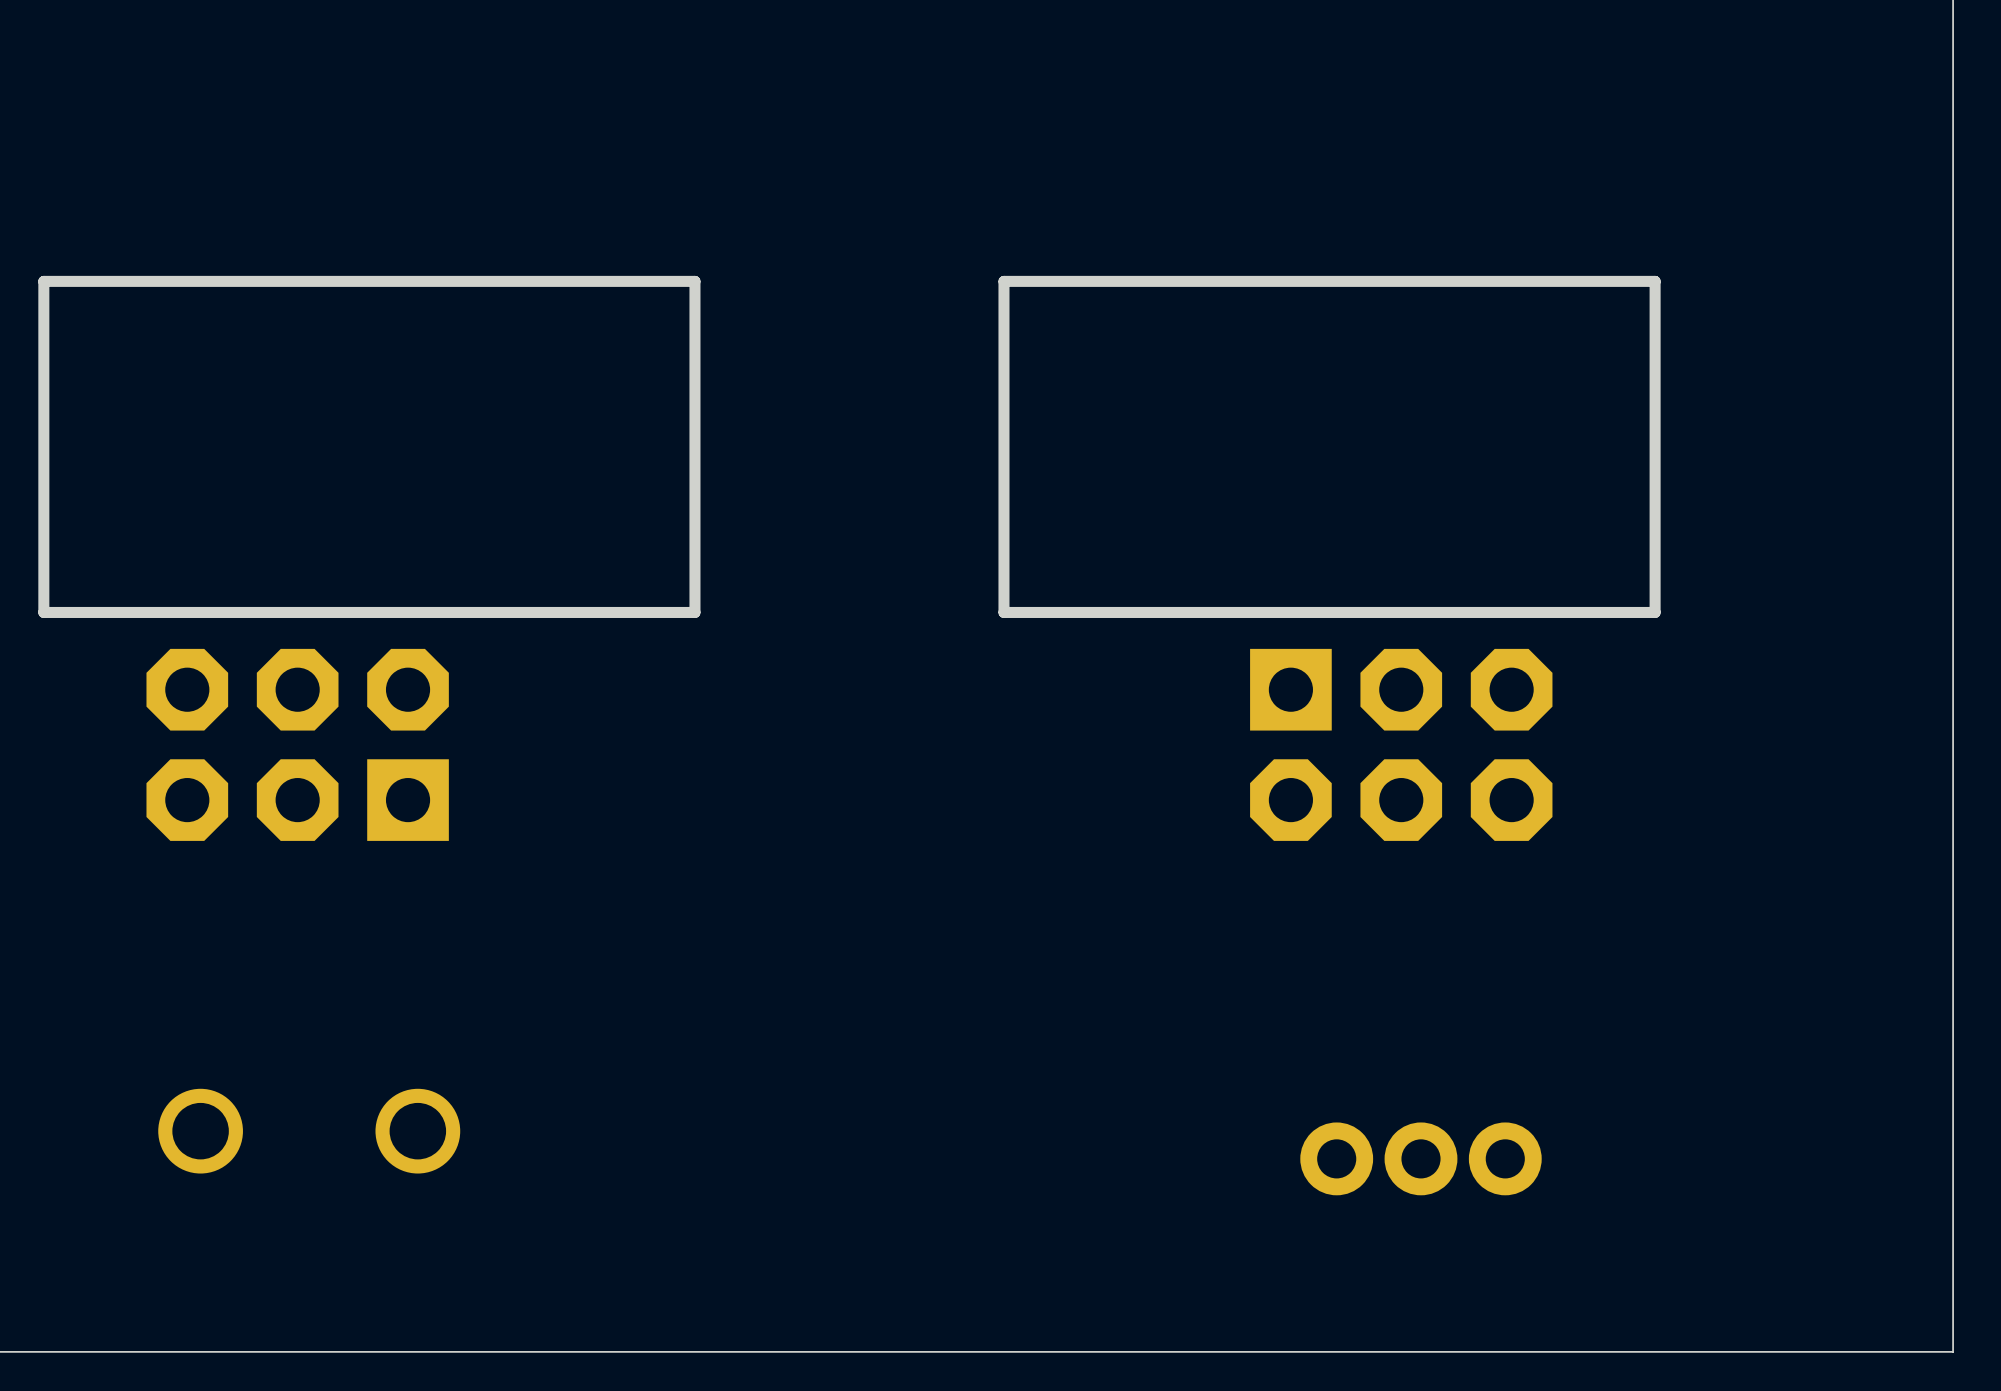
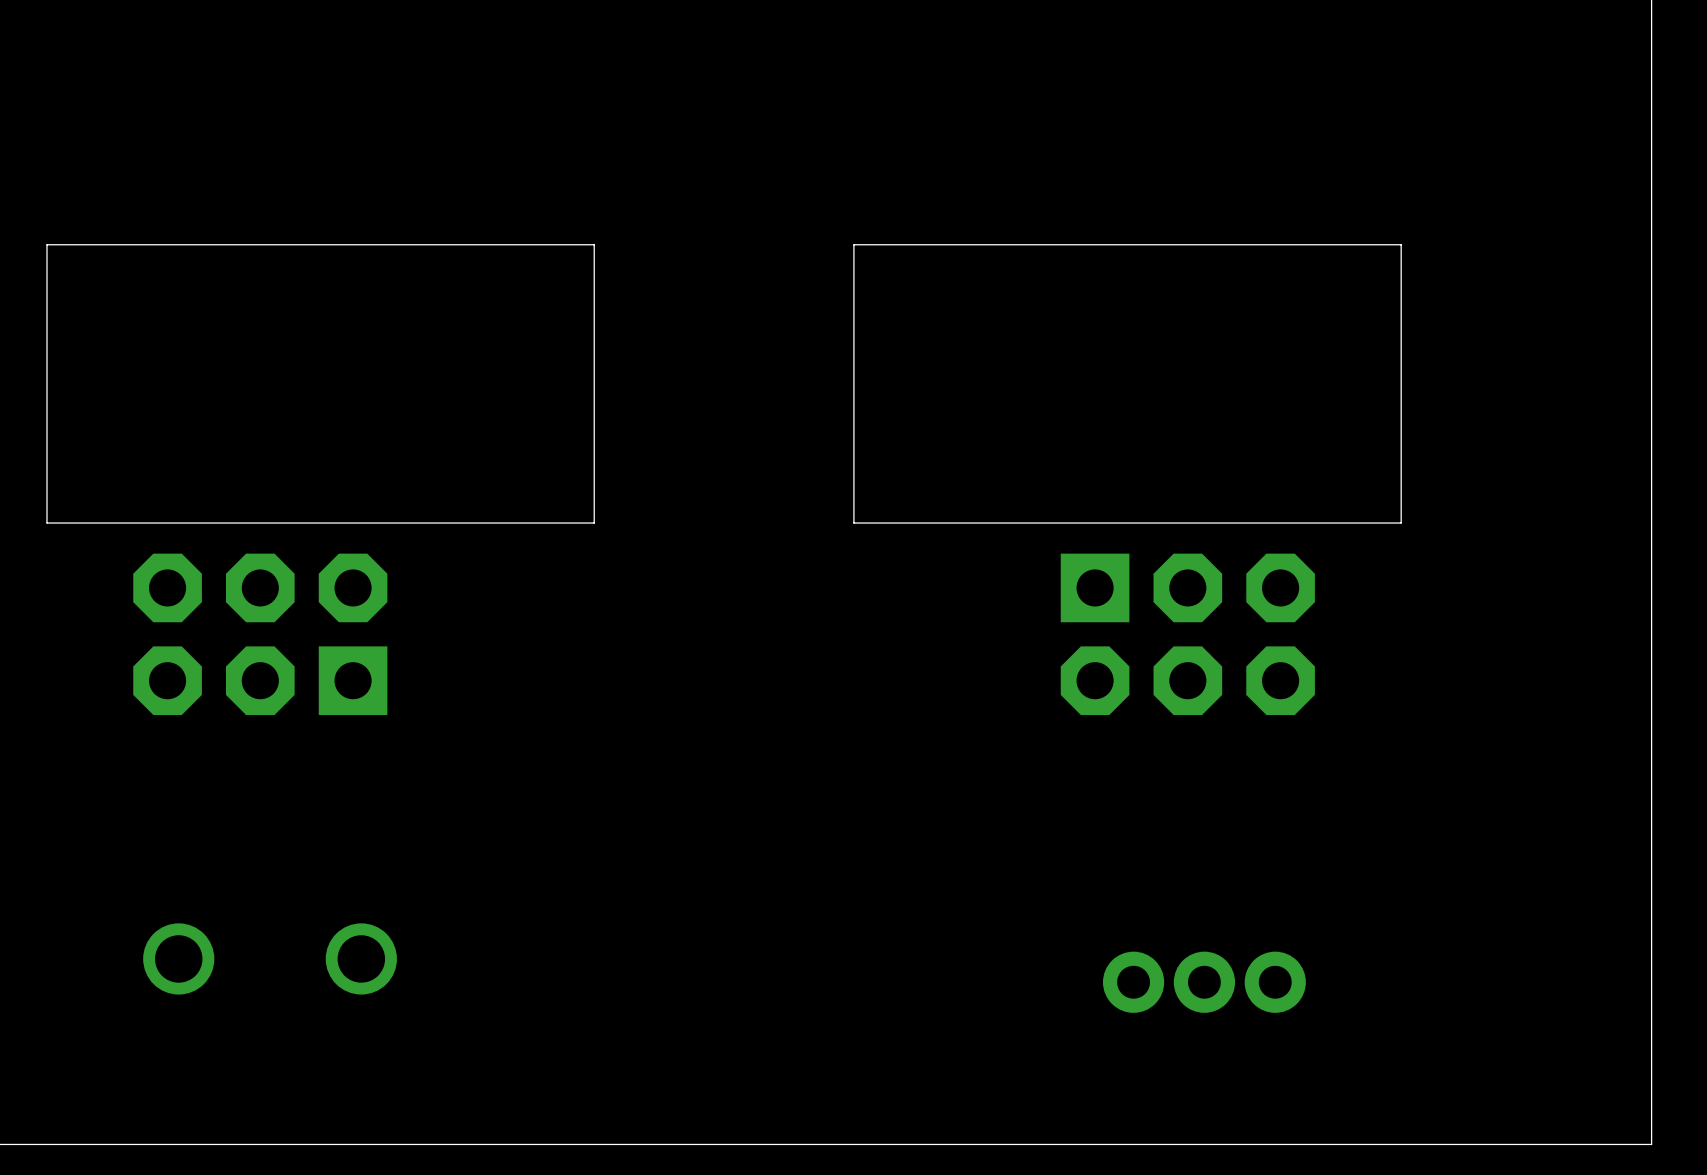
board edge width: thick (694, 281) (43, 281) (43, 612) (694, 612) (694, 281) -> thin (594, 244) (46, 244) (46, 523) (594, 523) (594, 244)
board edge width: thick (1655, 281) (1003, 281) (1003, 612) (1655, 612) (1655, 281) -> thin (1401, 244) (853, 244) (853, 523) (1401, 523) (1401, 244)

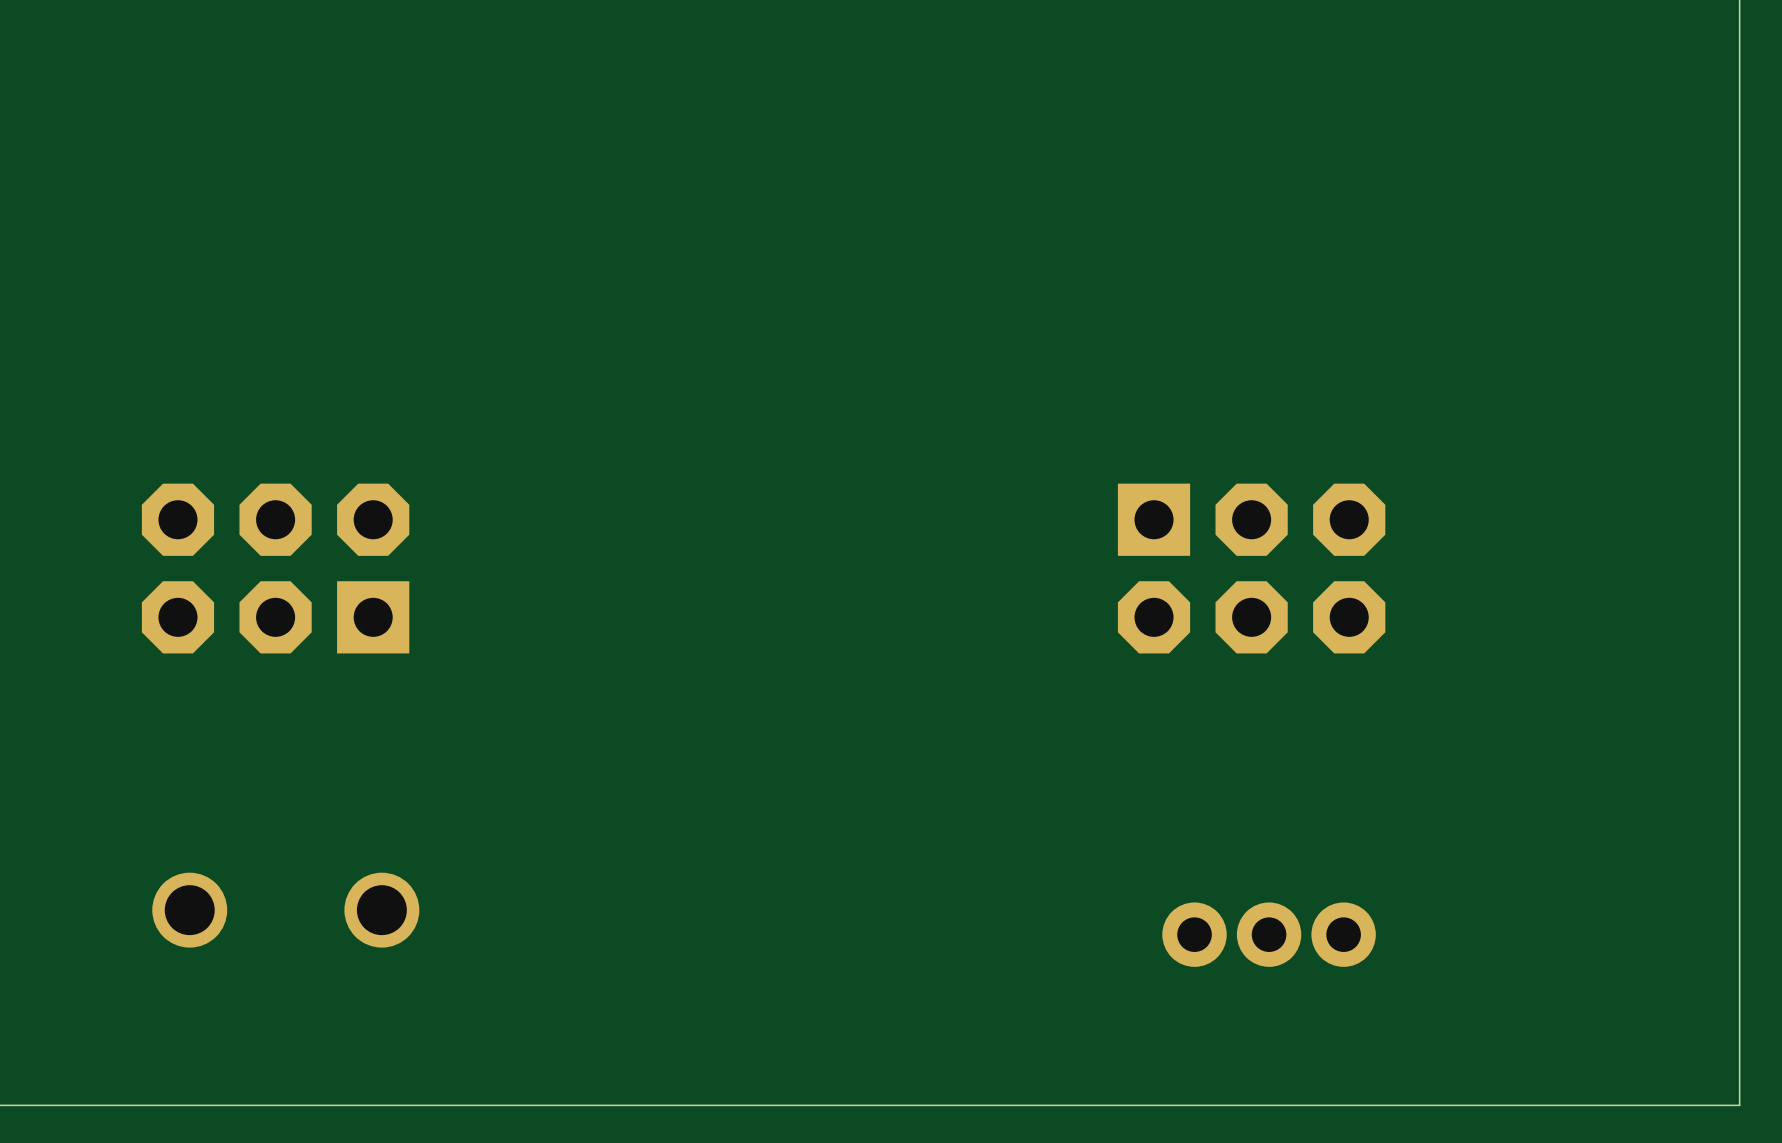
board edge: (594, 244) (46, 244) (46, 523) (594, 523) (594, 244) -> none
board edge: (1401, 244) (853, 244) (853, 523) (1401, 523) (1401, 244) -> none

